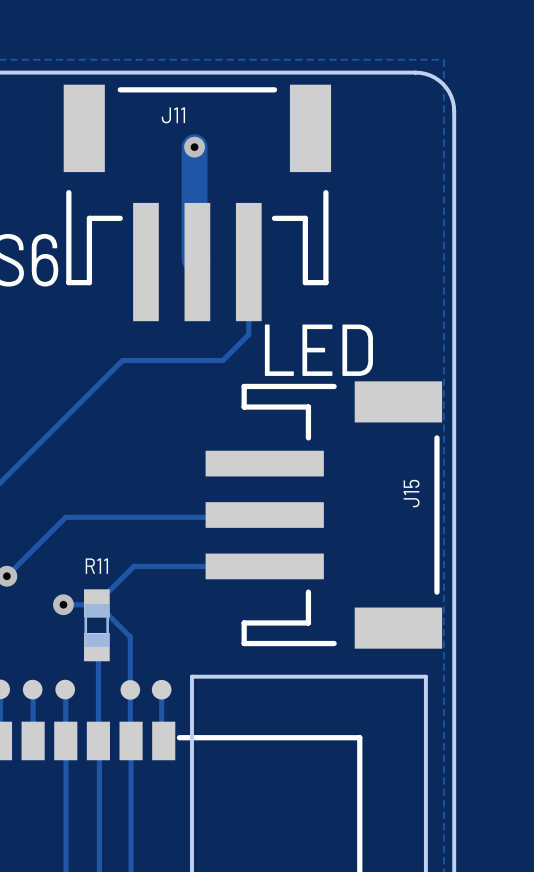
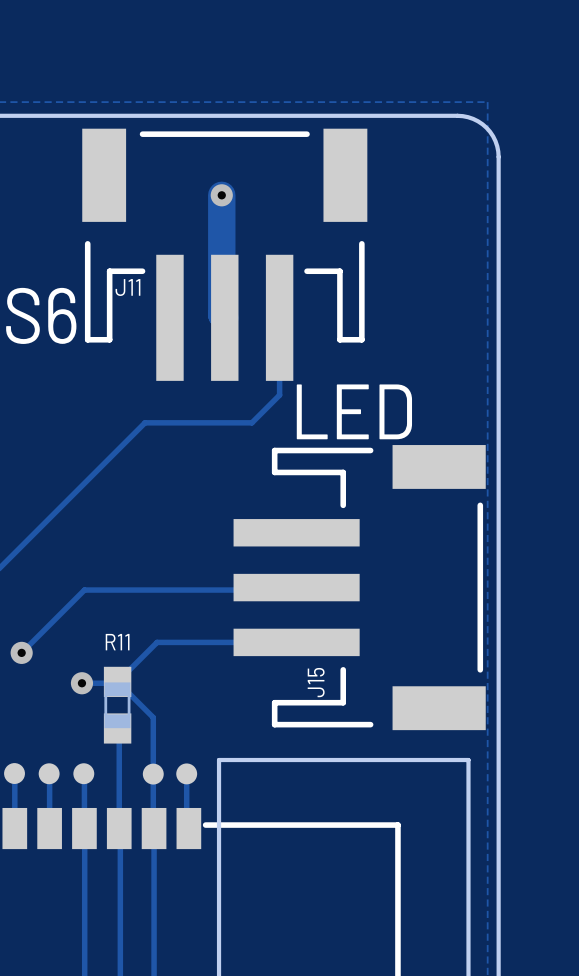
J11 name position: J11 (173, 115) -> J11 (127, 287)
J15 name position: J15 (411, 493) -> J15 (316, 682)

